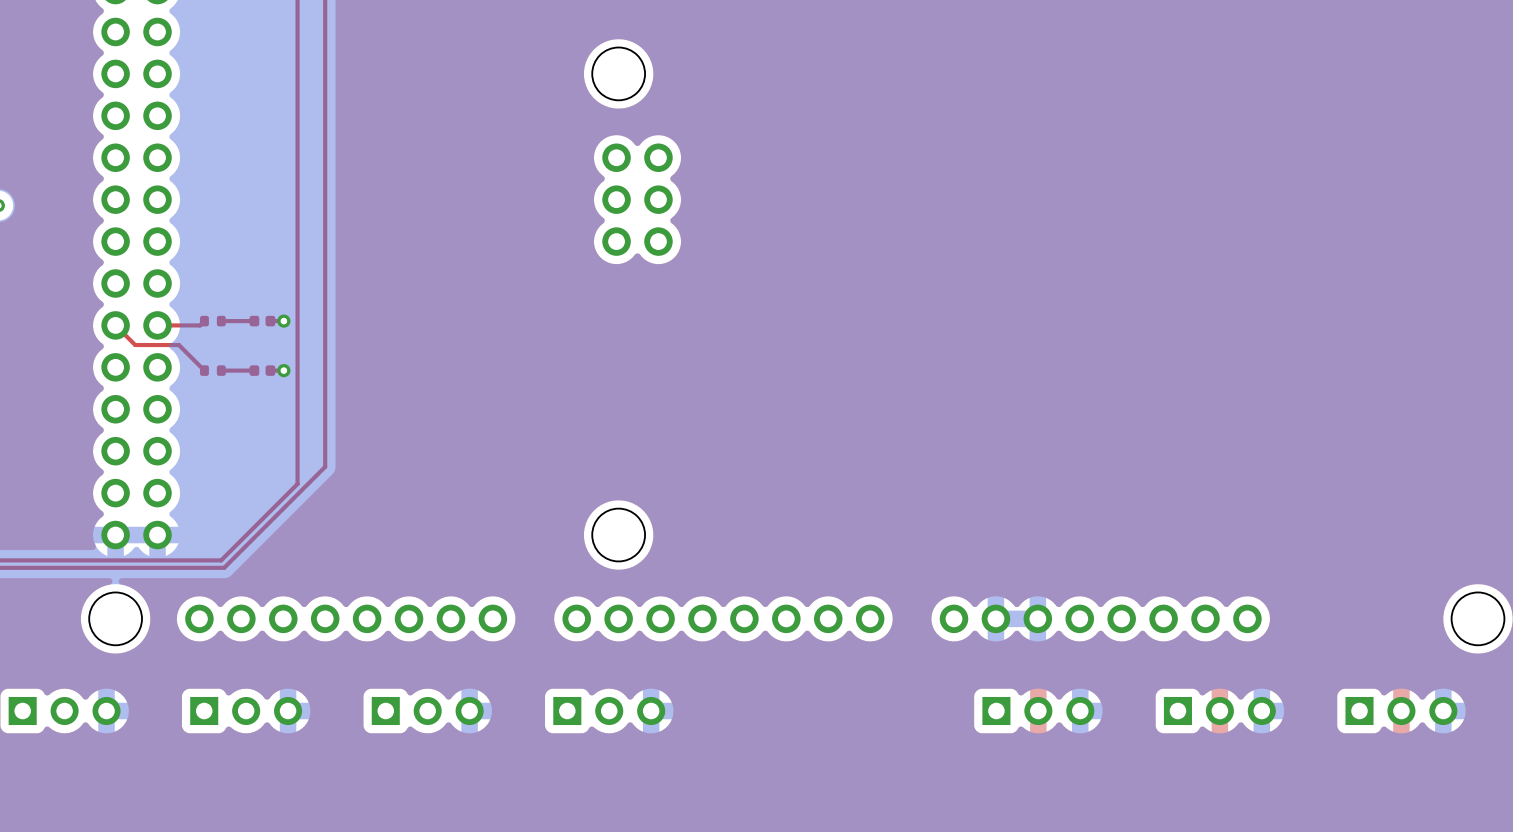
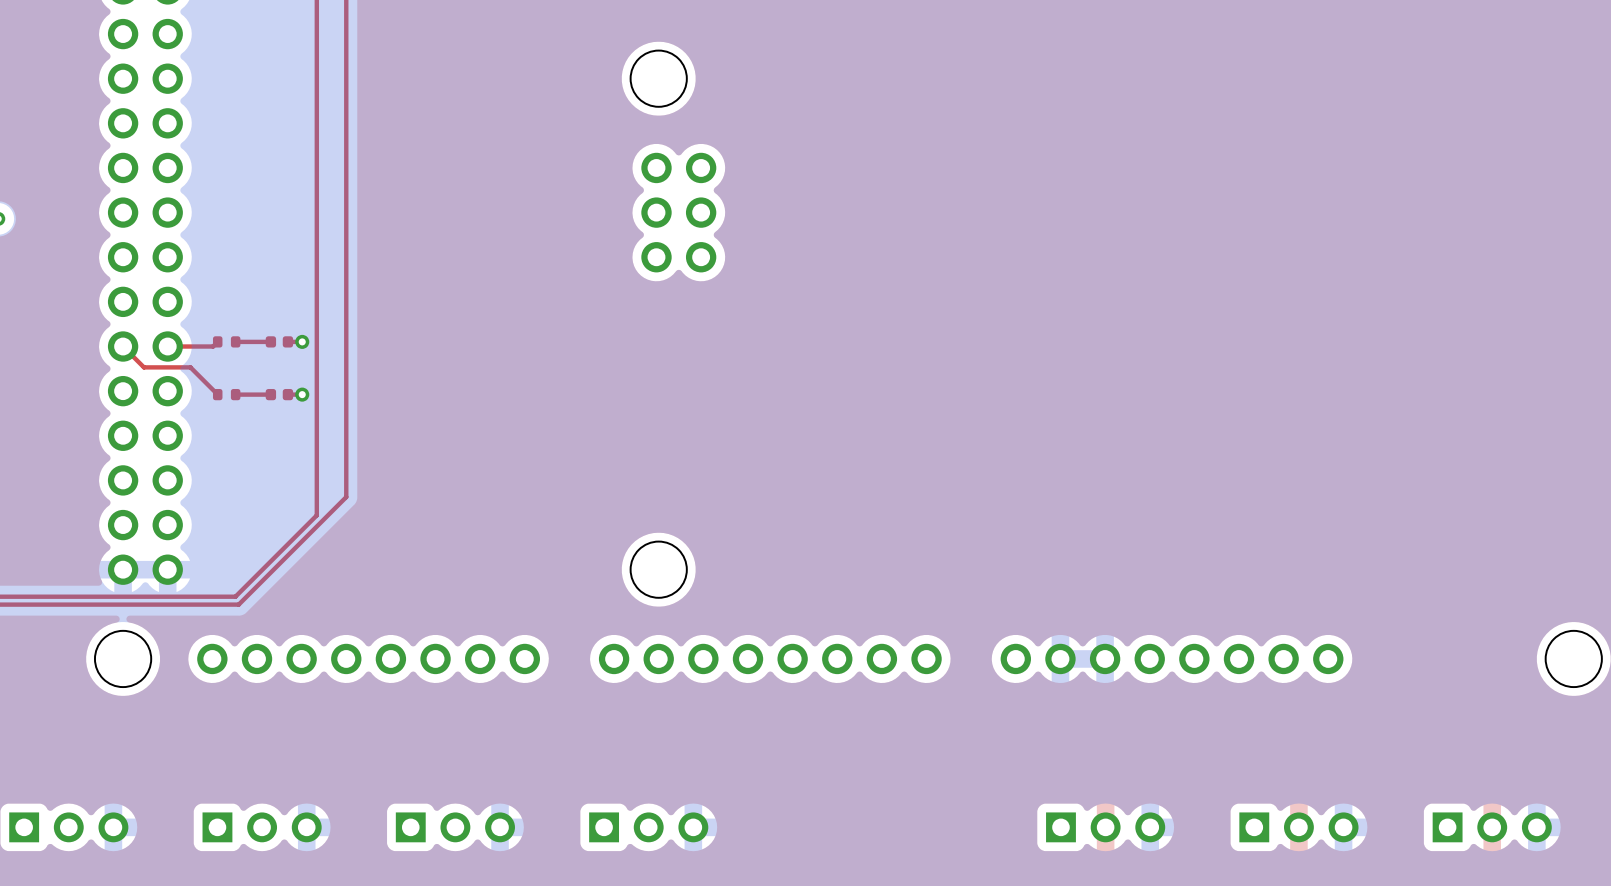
part position: (64, 711) -> (68, 827)
part position: (246, 711) -> (262, 827)
part position: (427, 711) -> (455, 827)
part position: (609, 711) -> (648, 827)
part position: (1038, 711) -> (1105, 827)
part position: (1219, 711) -> (1298, 827)
part position: (1401, 711) -> (1492, 827)

